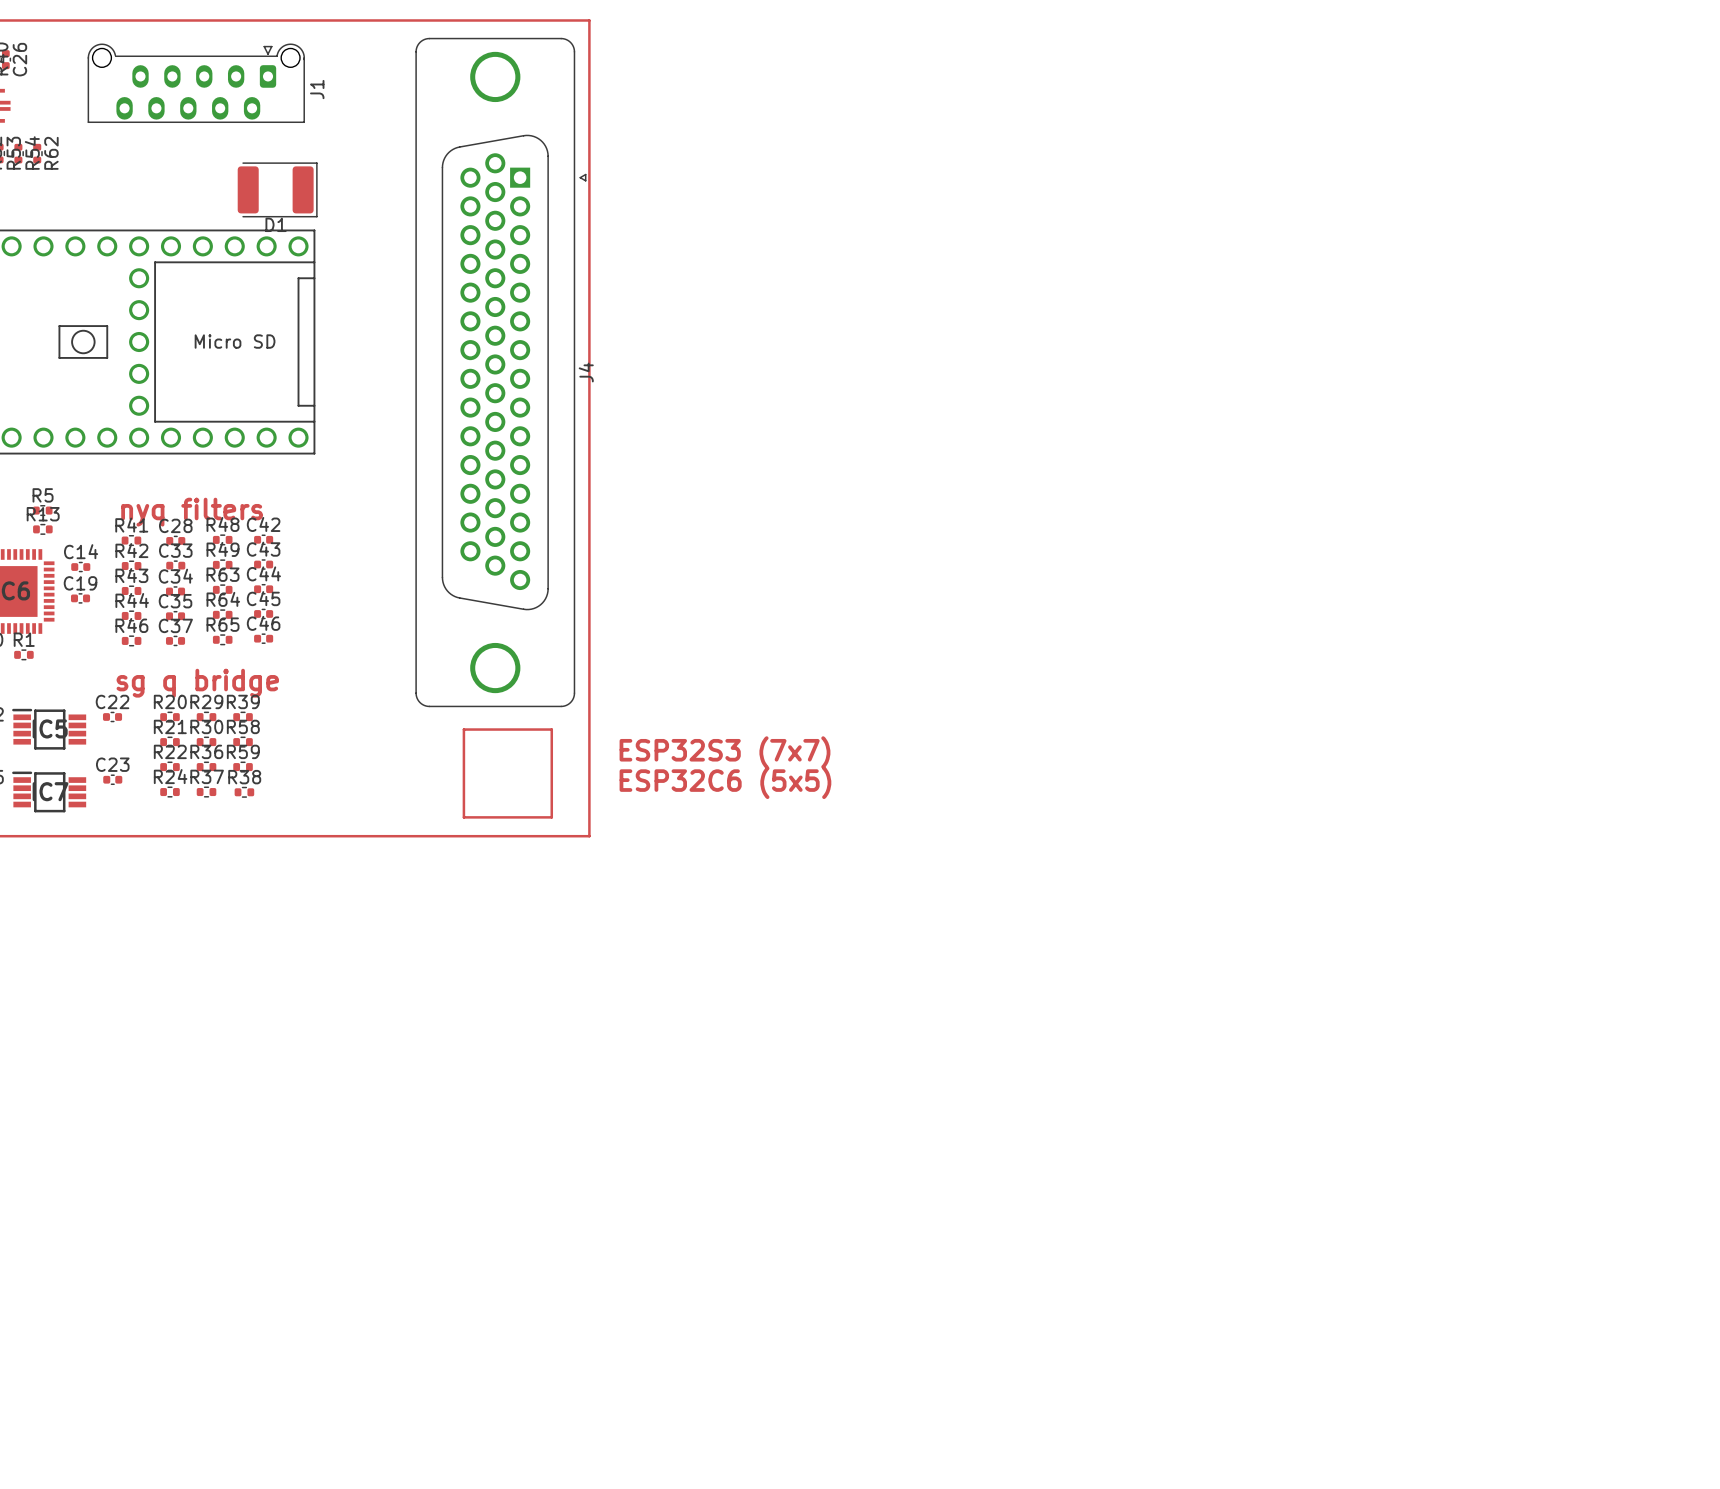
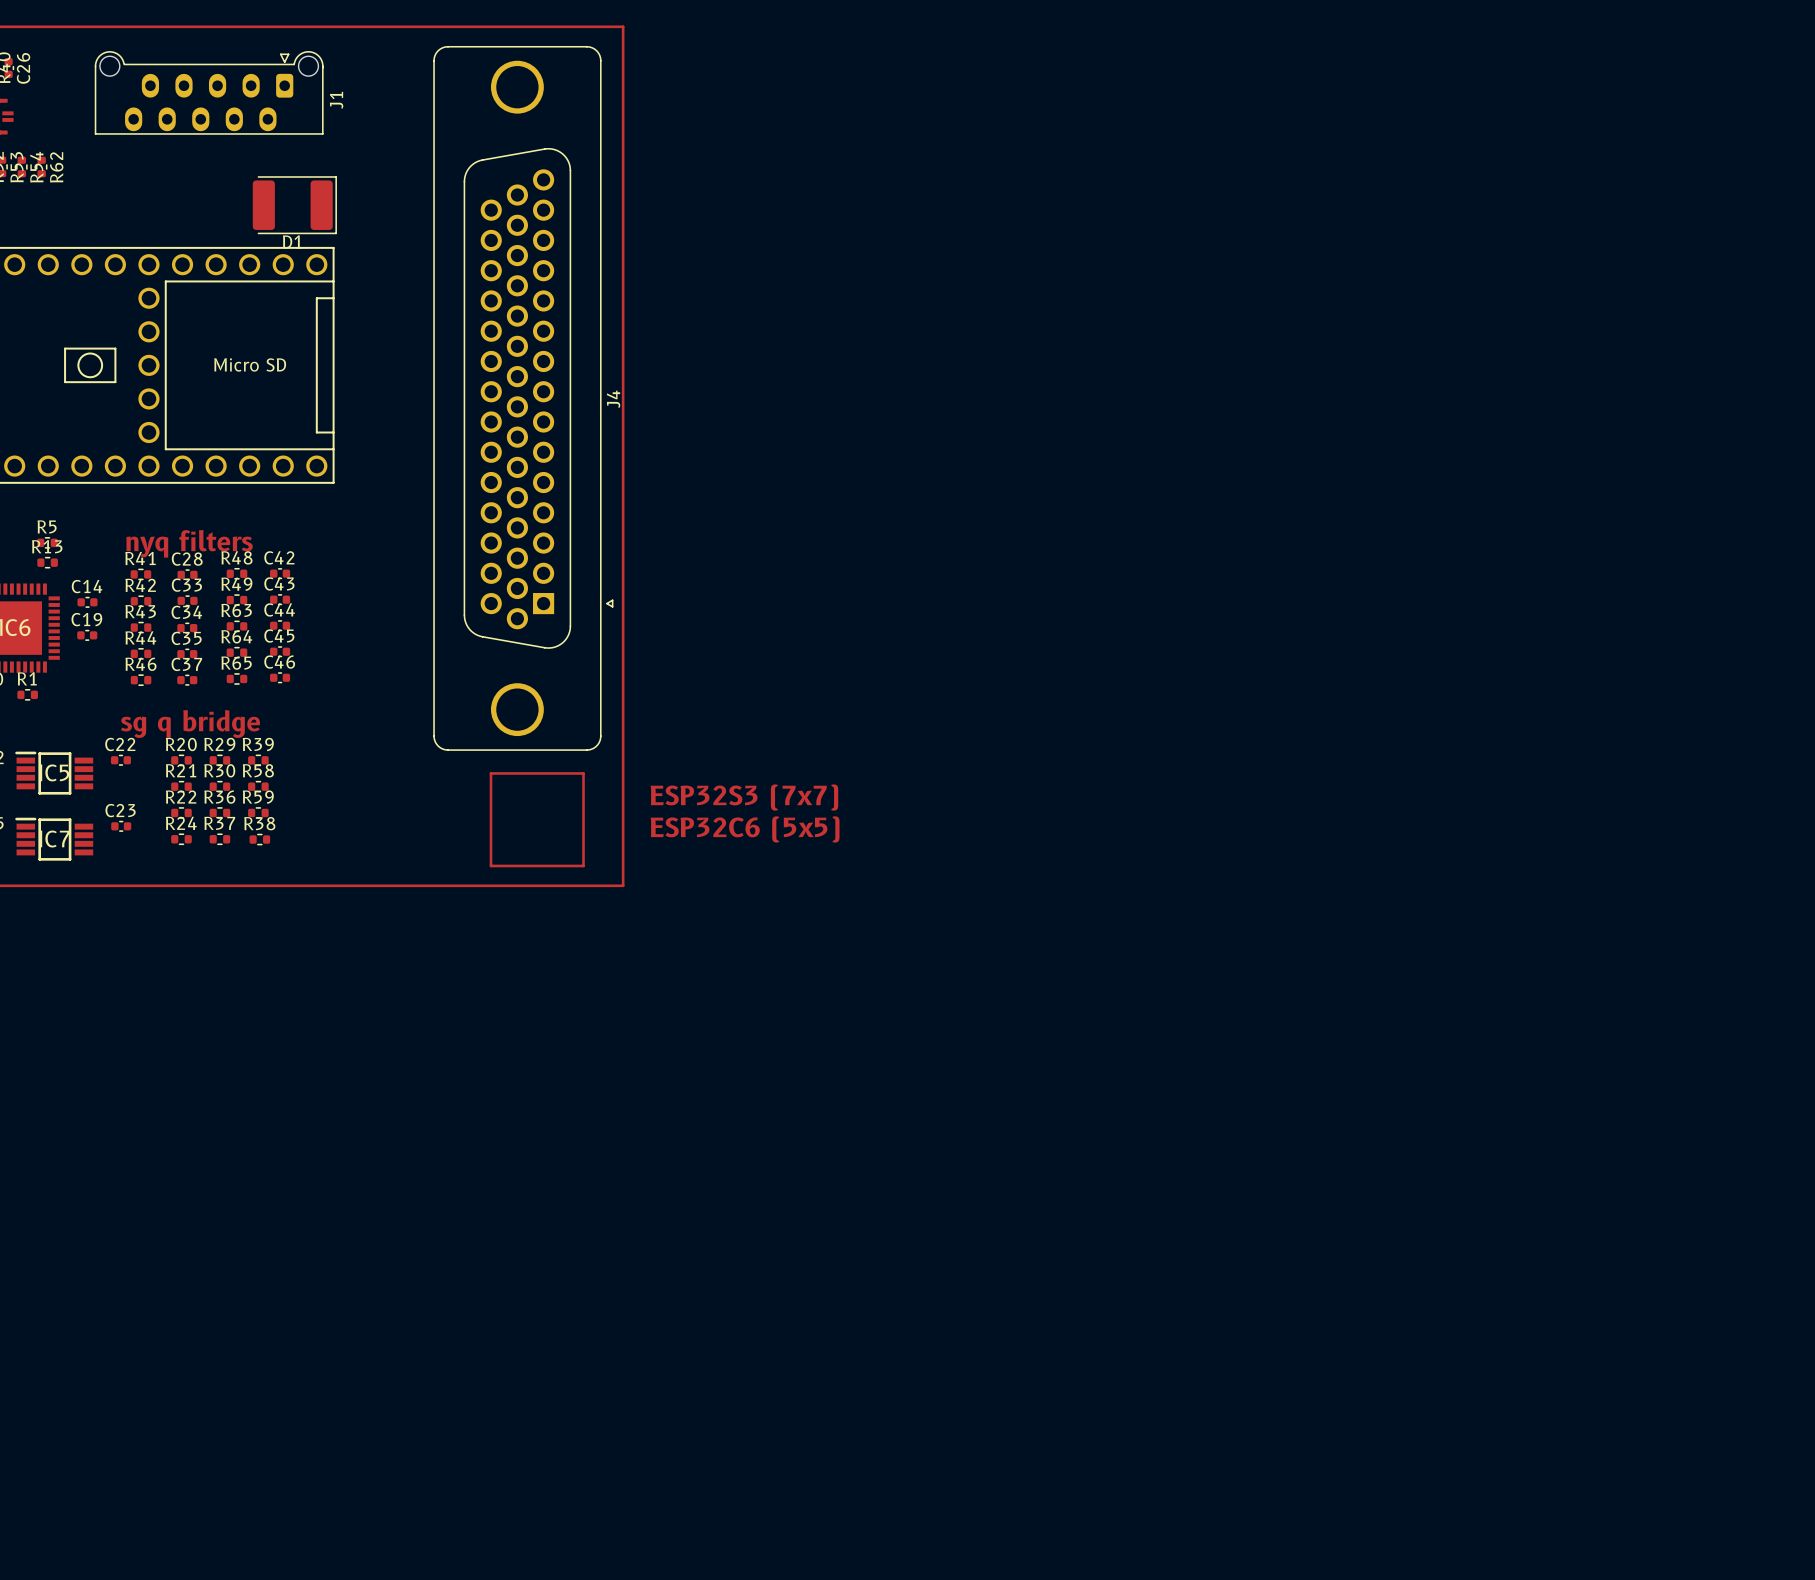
J4 footprint: [415, 37, 587, 708] -> [433, 45, 614, 751]

